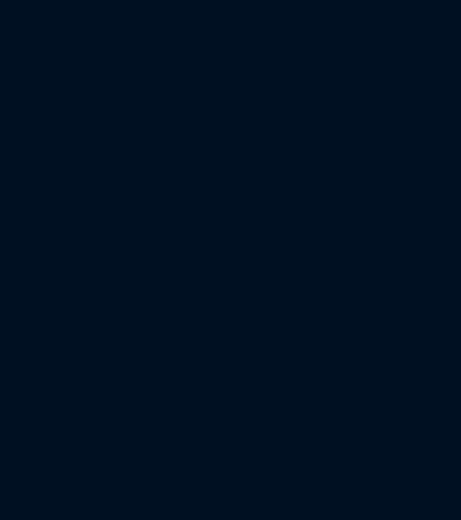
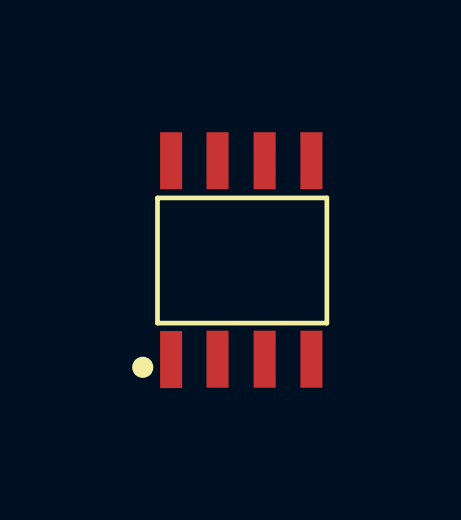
part: none -> (230, 260)

